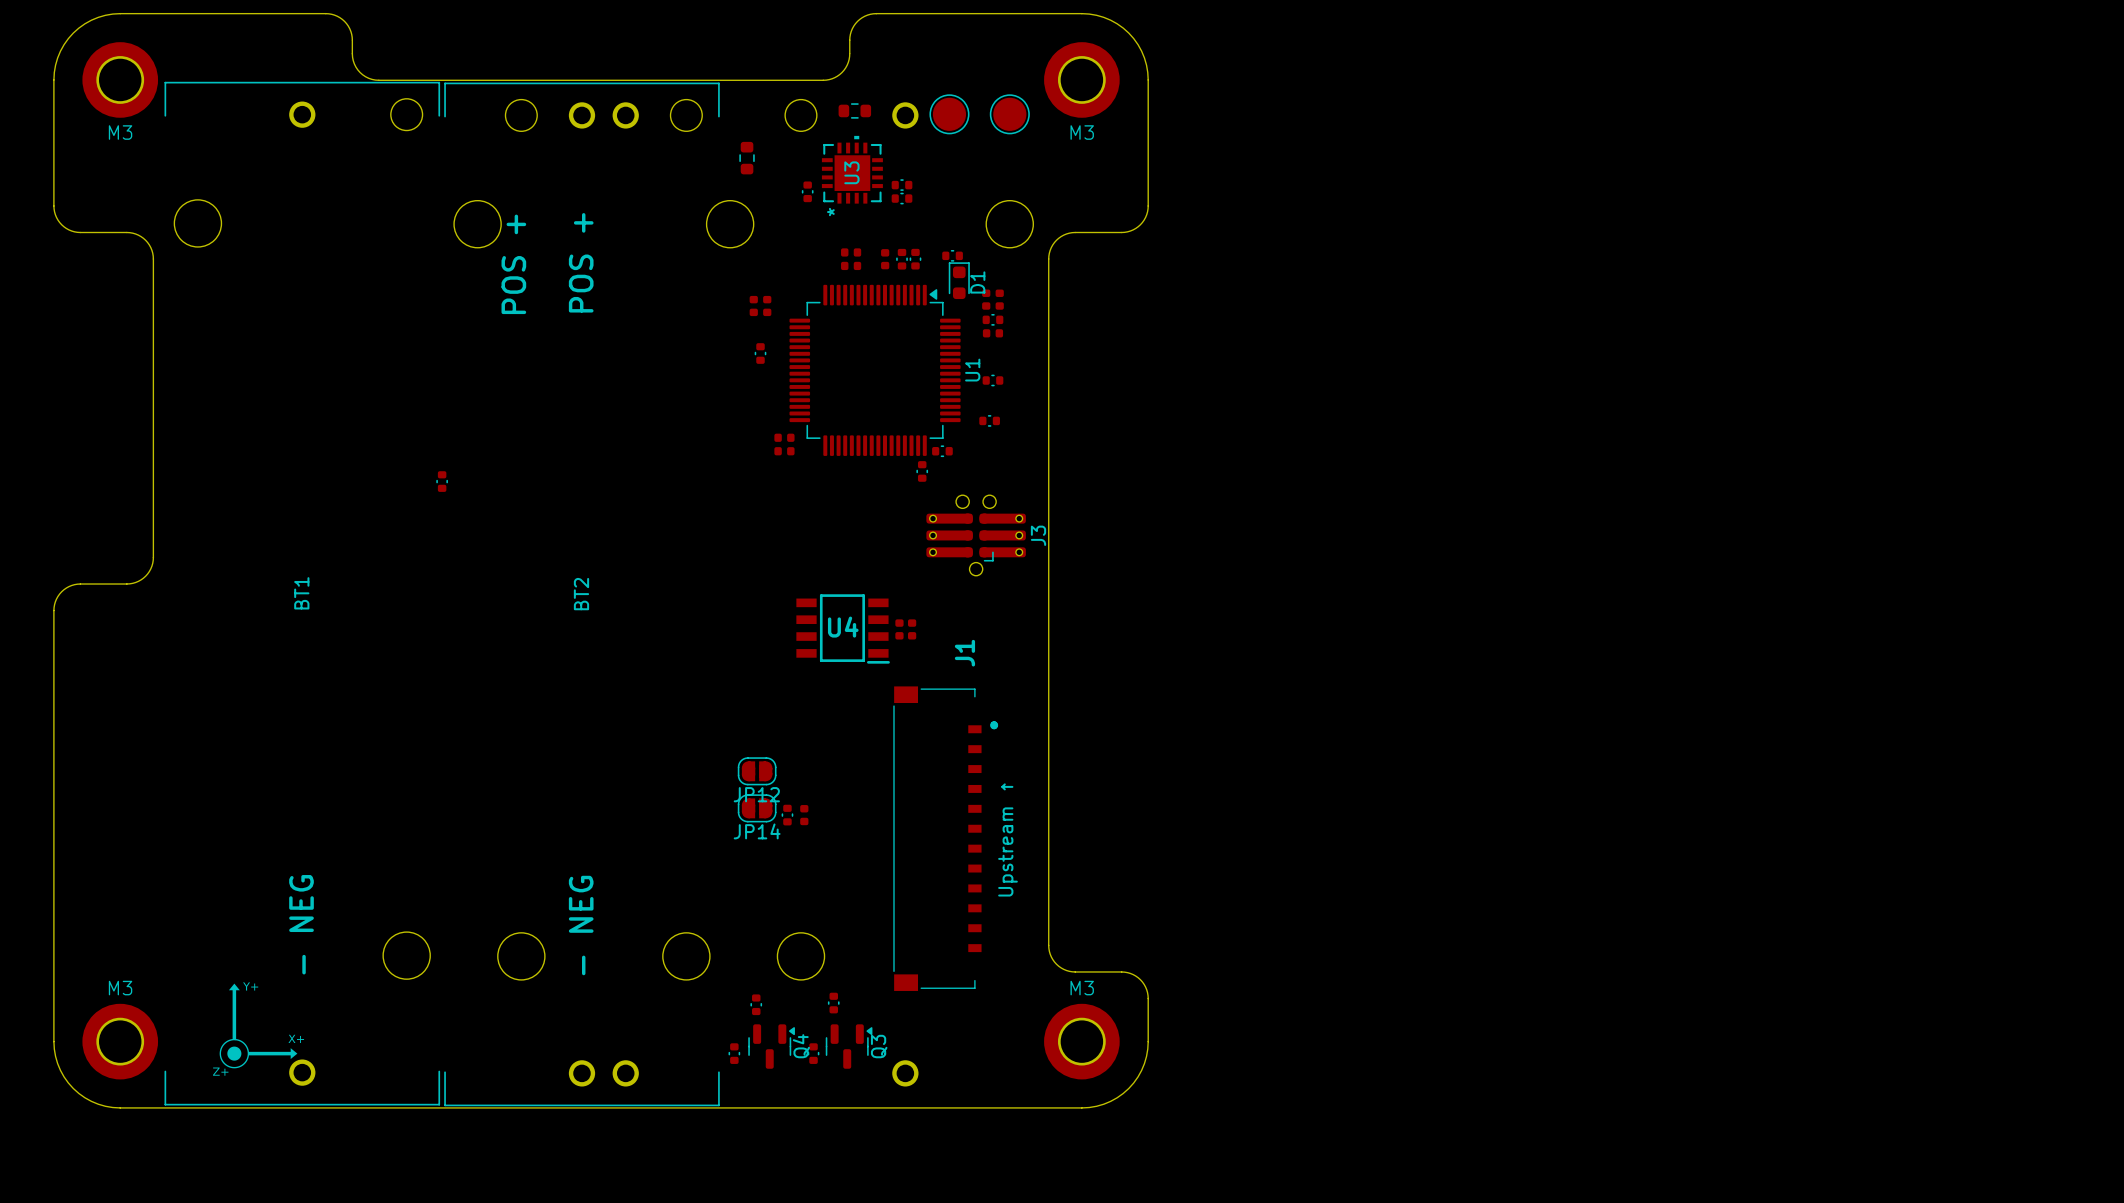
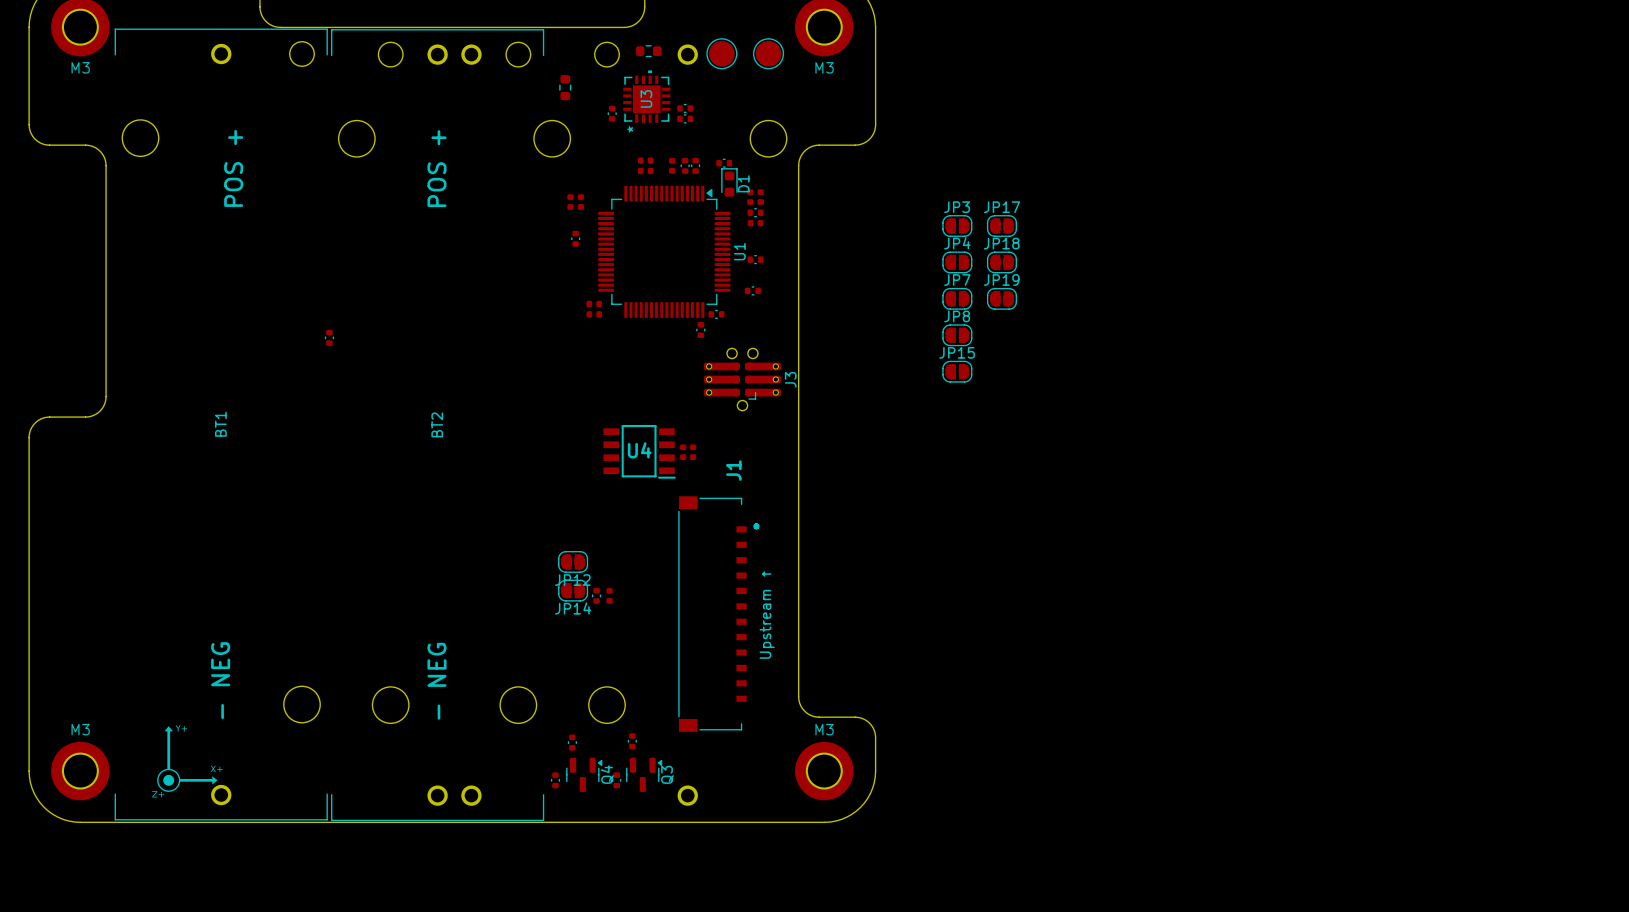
BT1 text position: POS + (513, 264) -> POS + (233, 168)
JP3: none -> (957, 226)
JP17: none -> (1001, 226)
JP4: none -> (957, 262)
JP18: none -> (1001, 262)
JP7: none -> (957, 298)
JP19: none -> (1001, 298)
JP8: none -> (957, 335)
JP15: none -> (957, 371)

